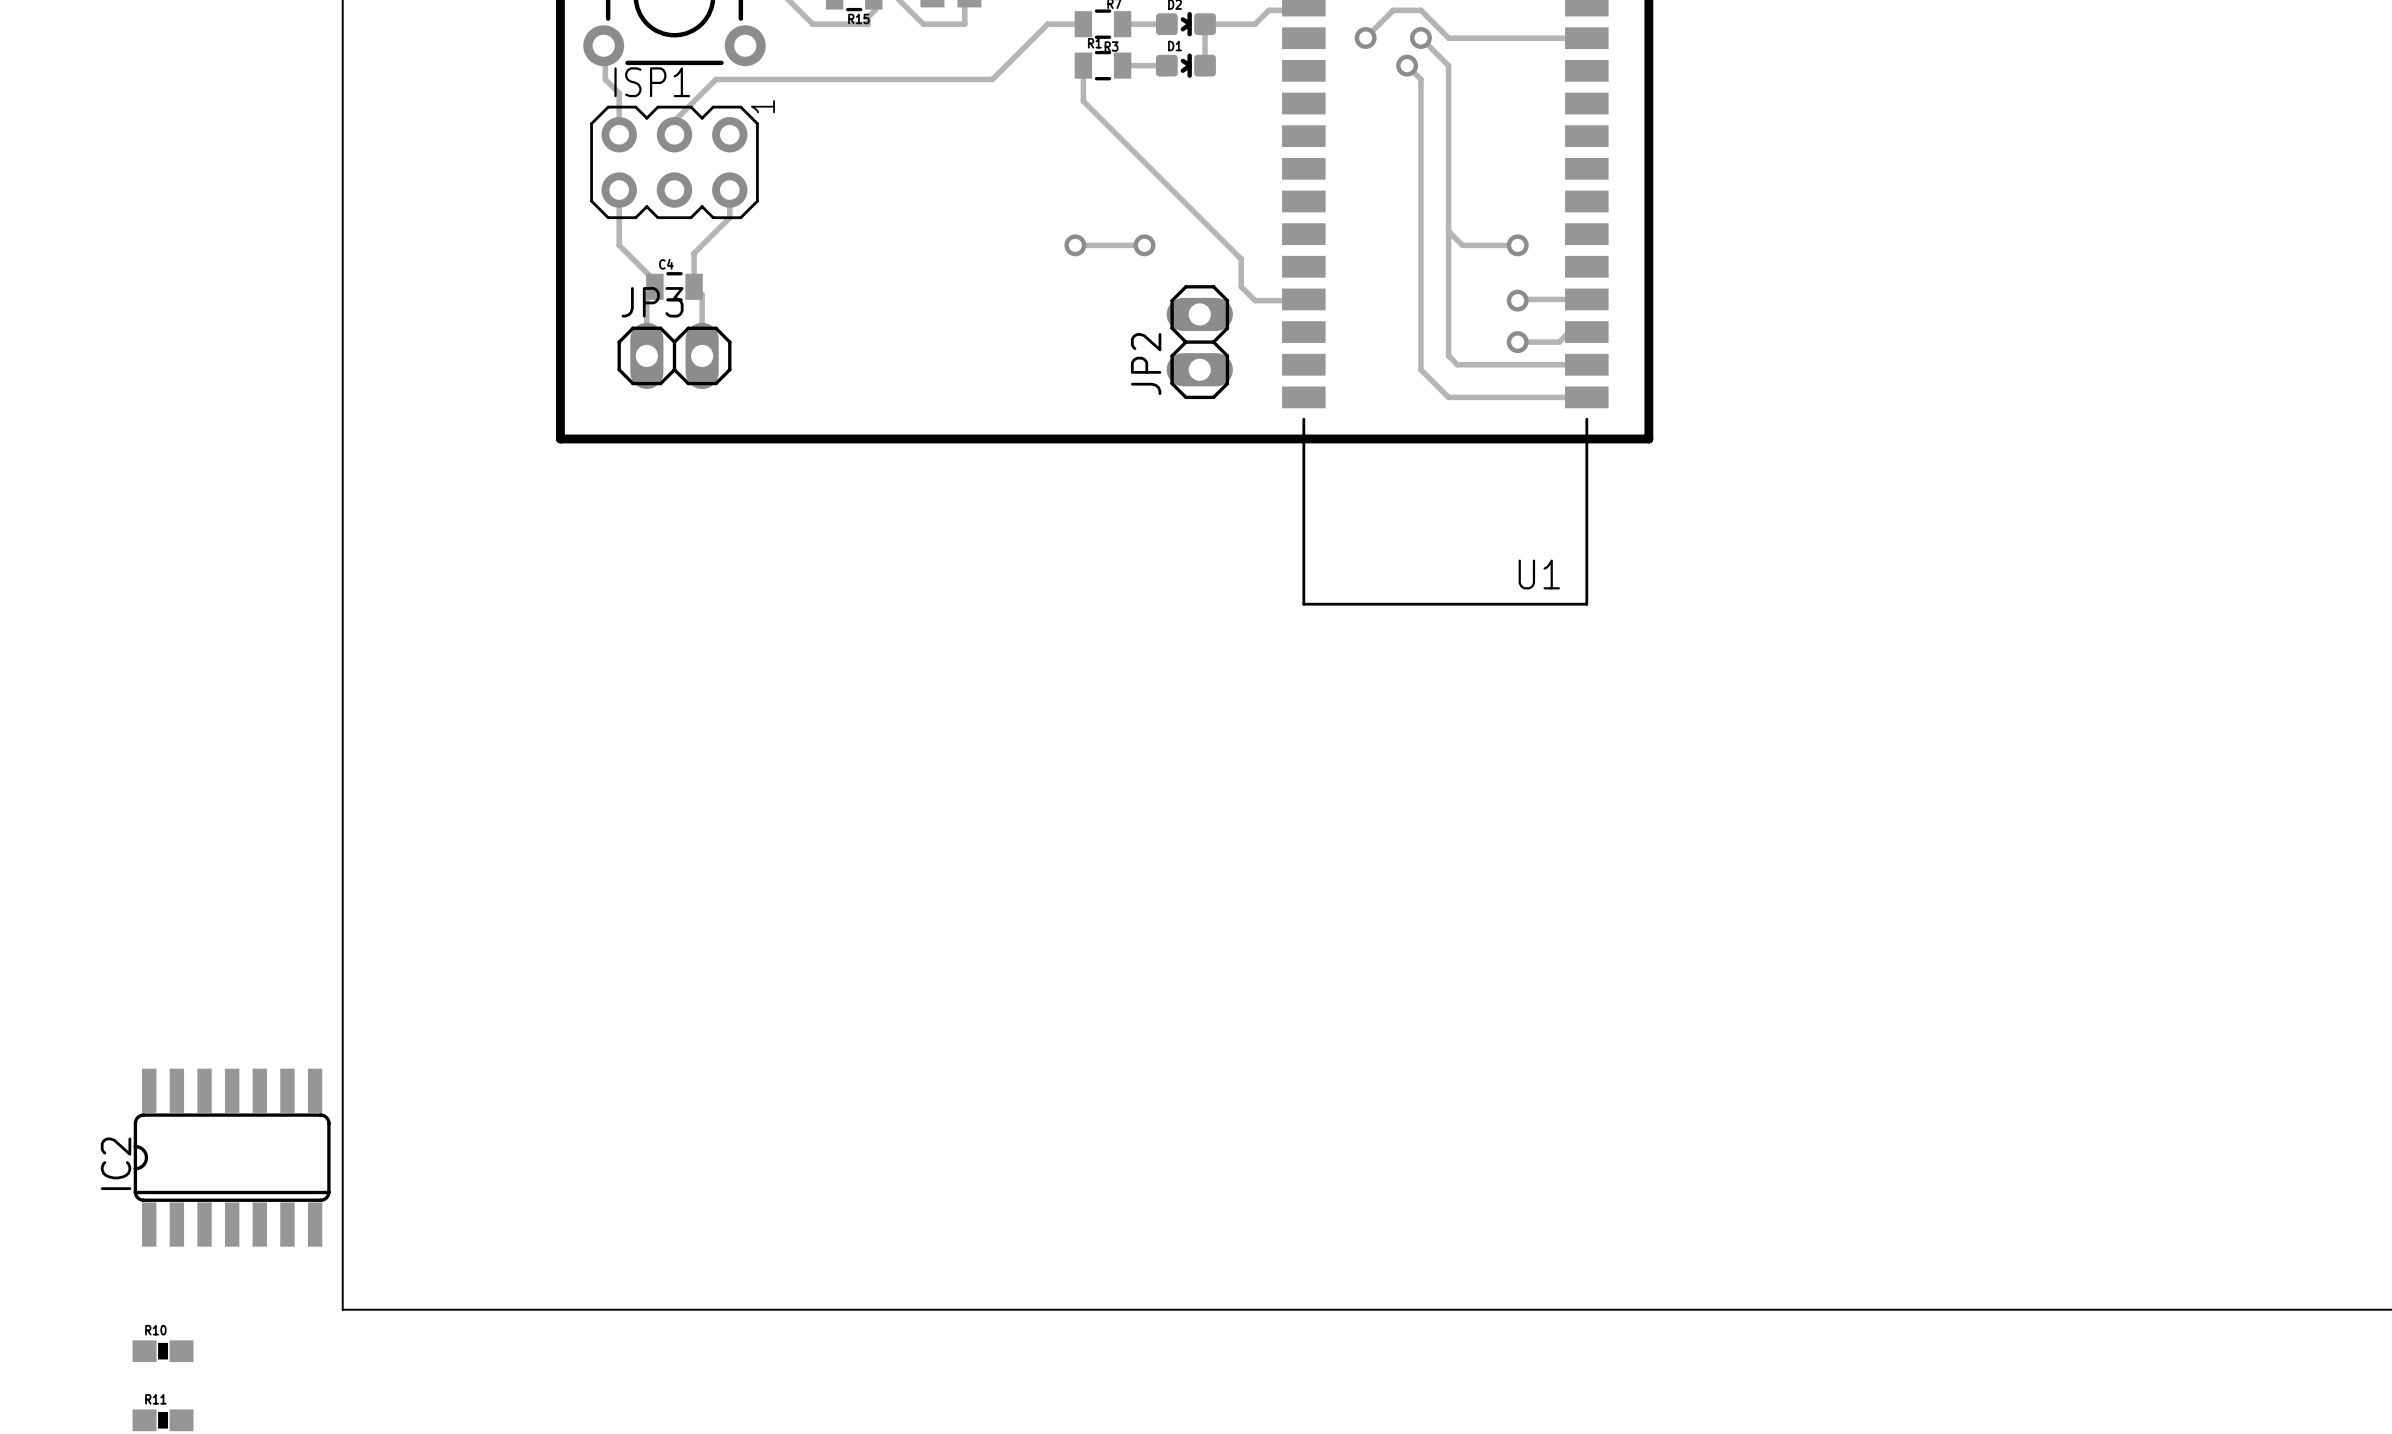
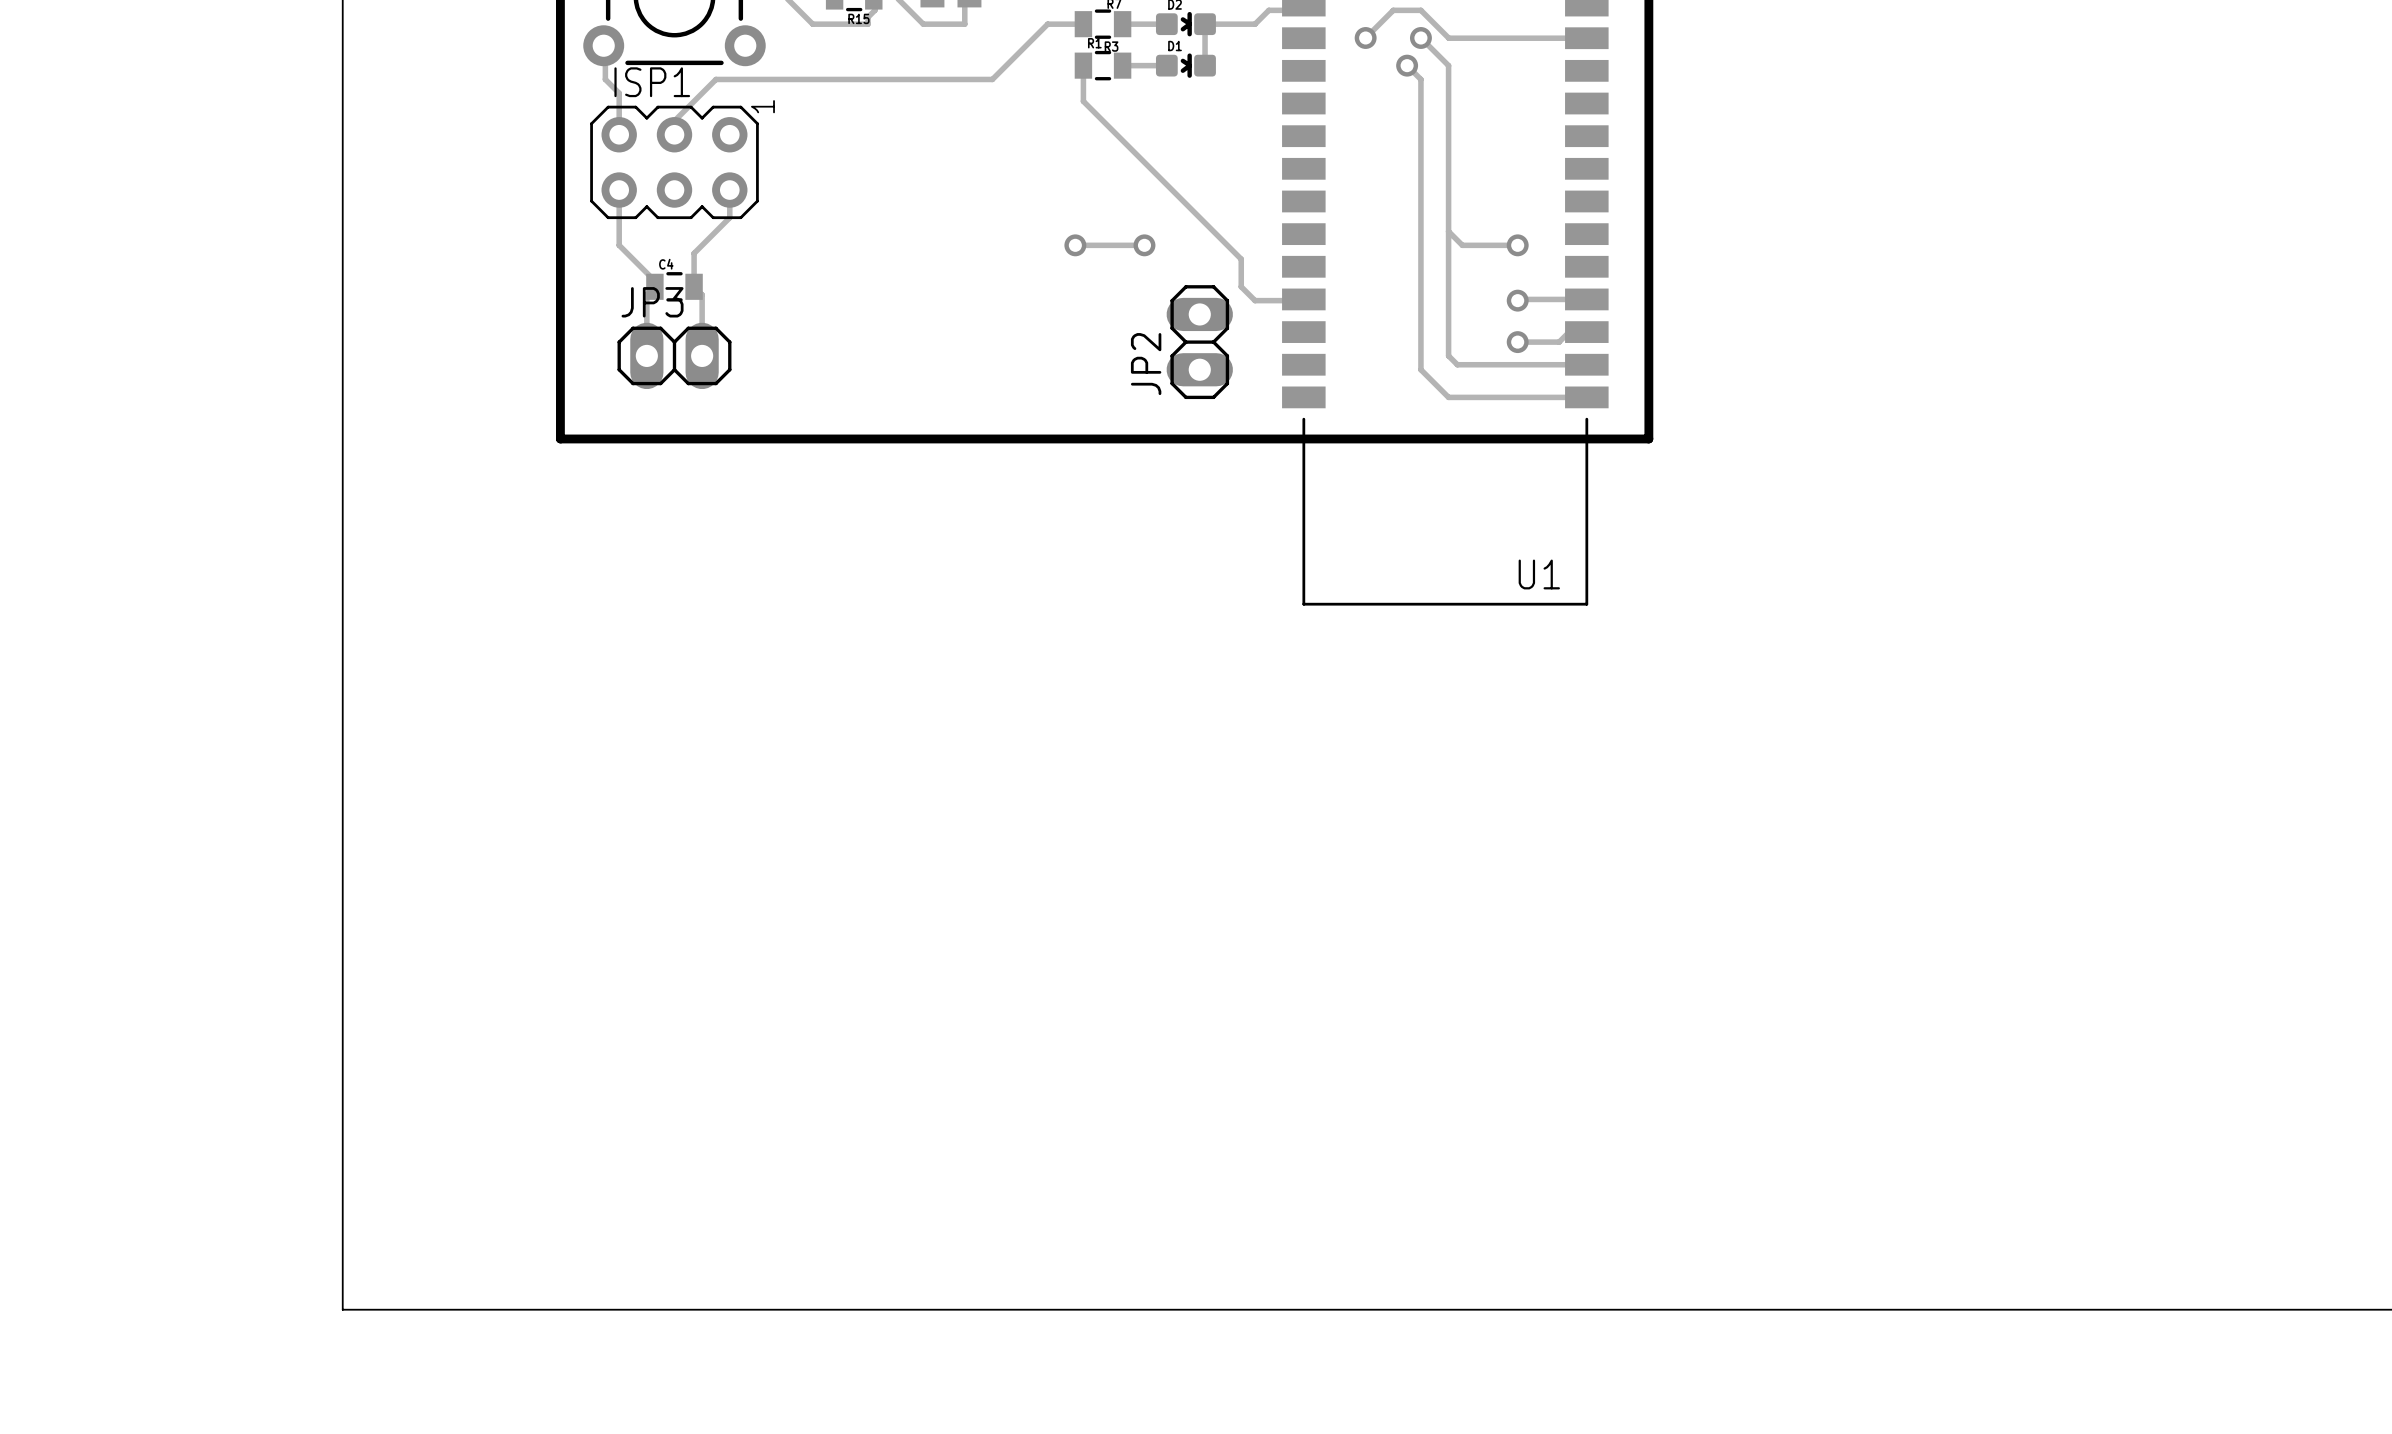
IC2: (232, 1157) -> none
R10: (163, 1351) -> none
R11: (163, 1420) -> none

